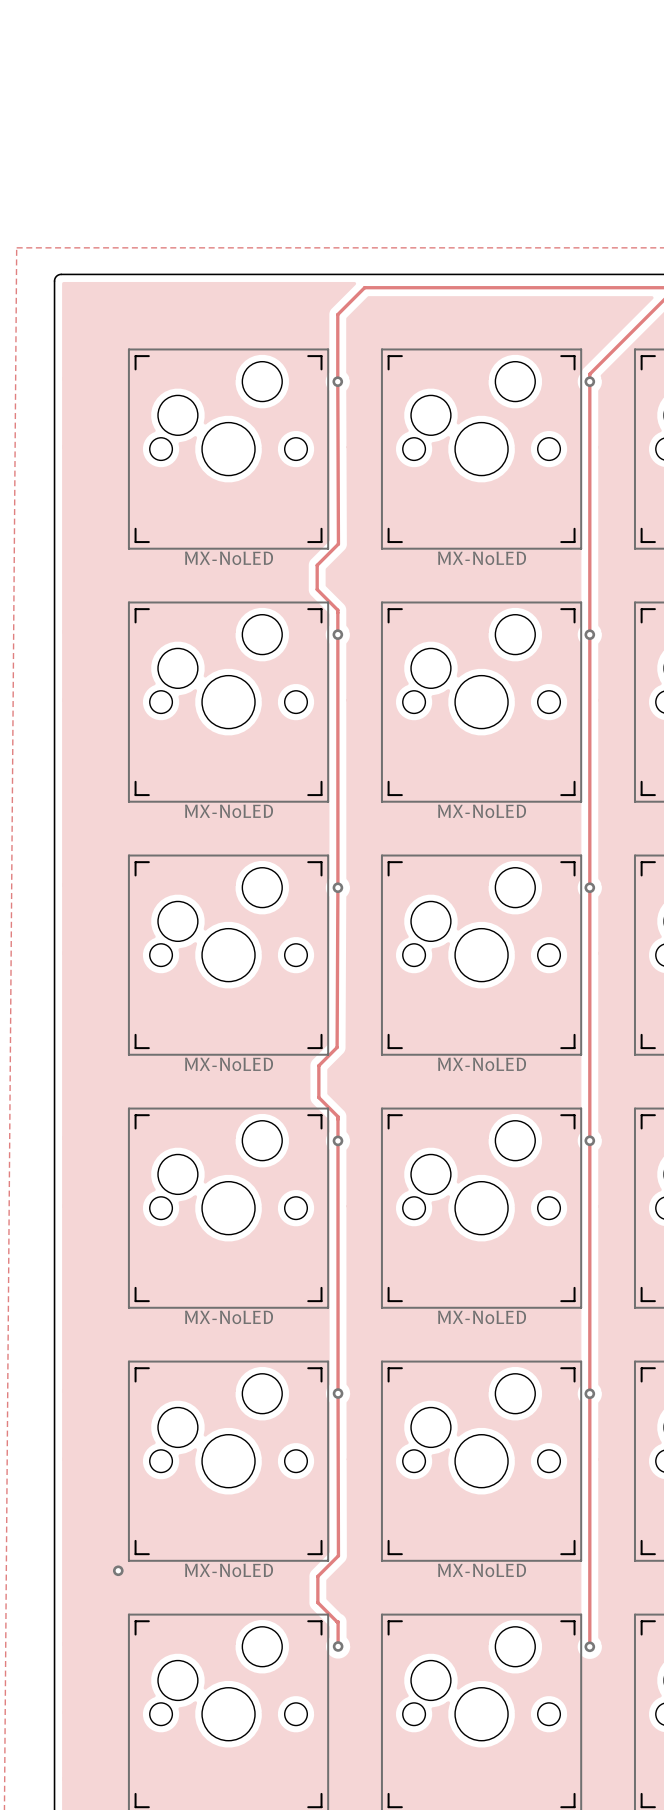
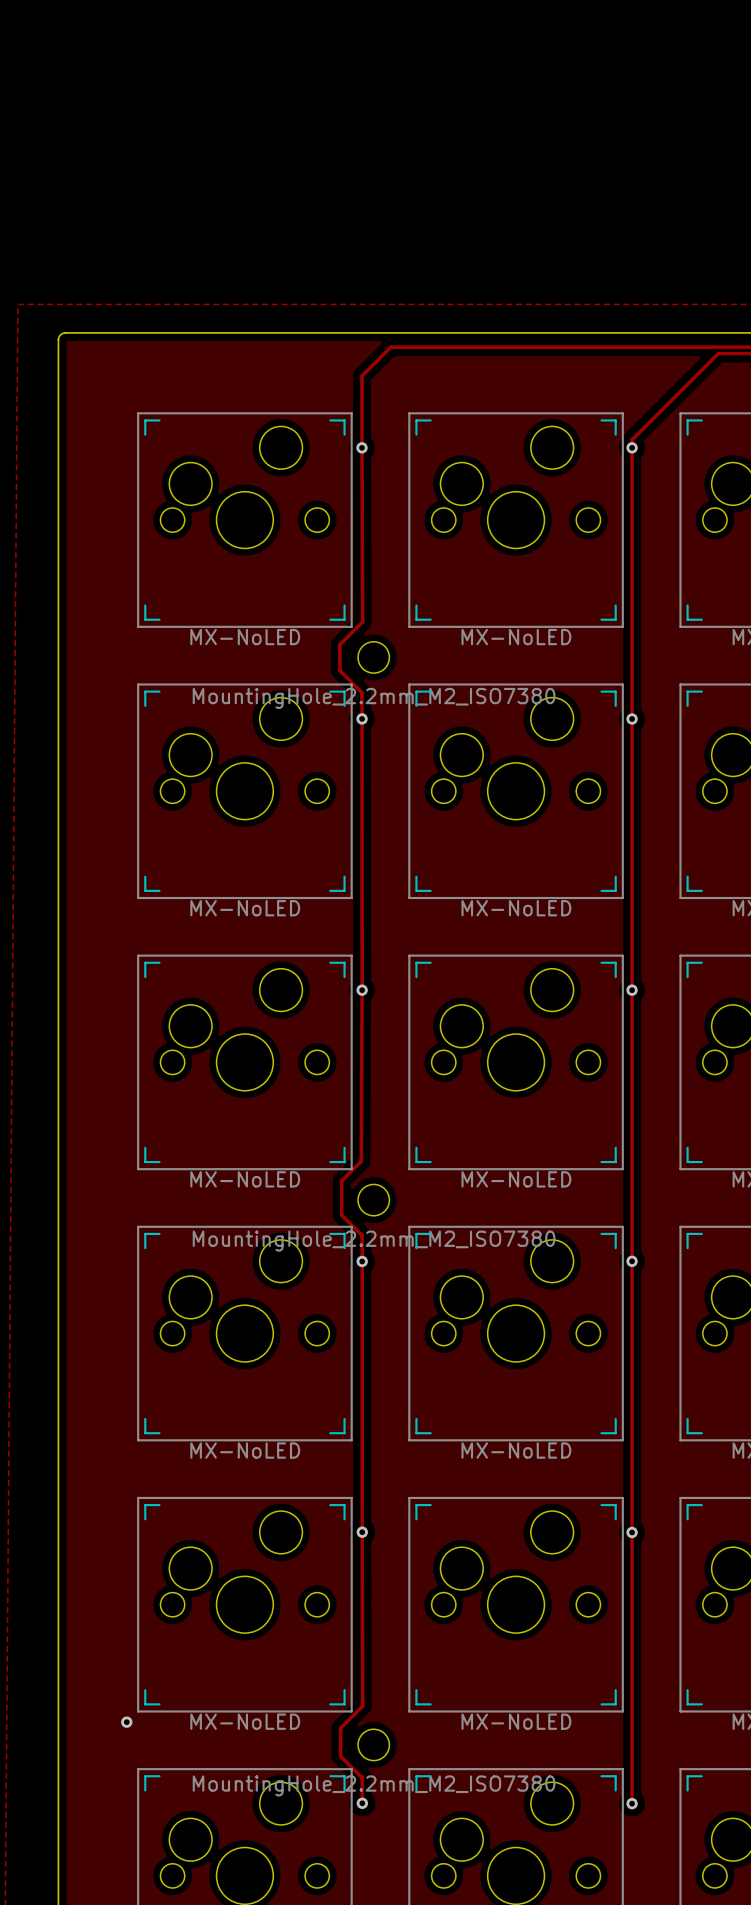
part: none -> MountingHole_2.2mm_M2_ISO7380 (373, 657)
part: none -> MountingHole_2.2mm_M2_ISO7380 (373, 1200)
part: none -> MountingHole_2.2mm_M2_ISO7380 (373, 1744)

